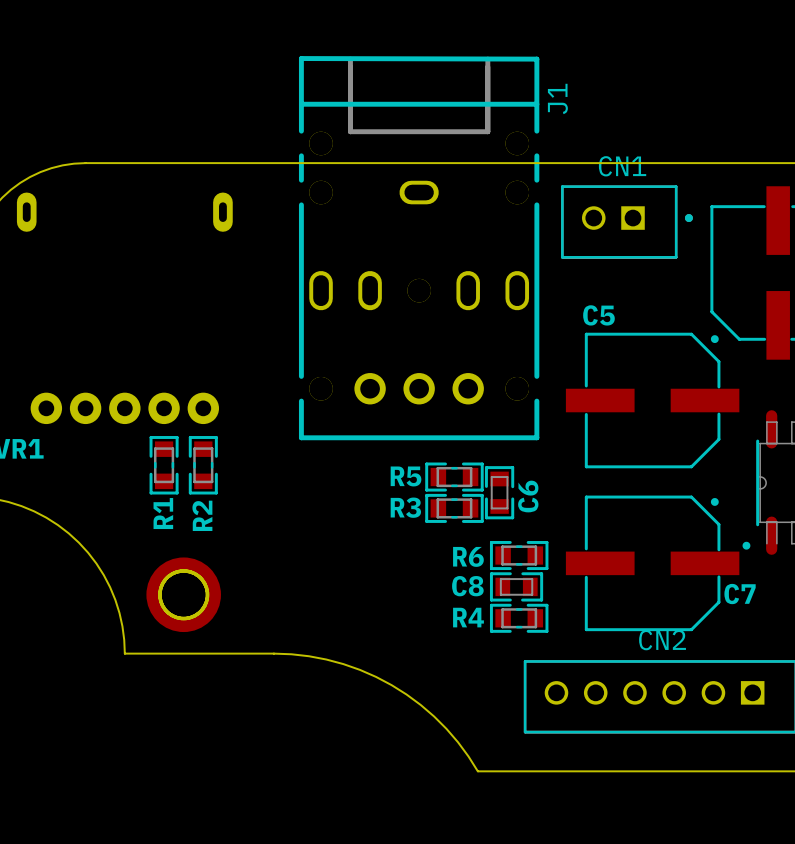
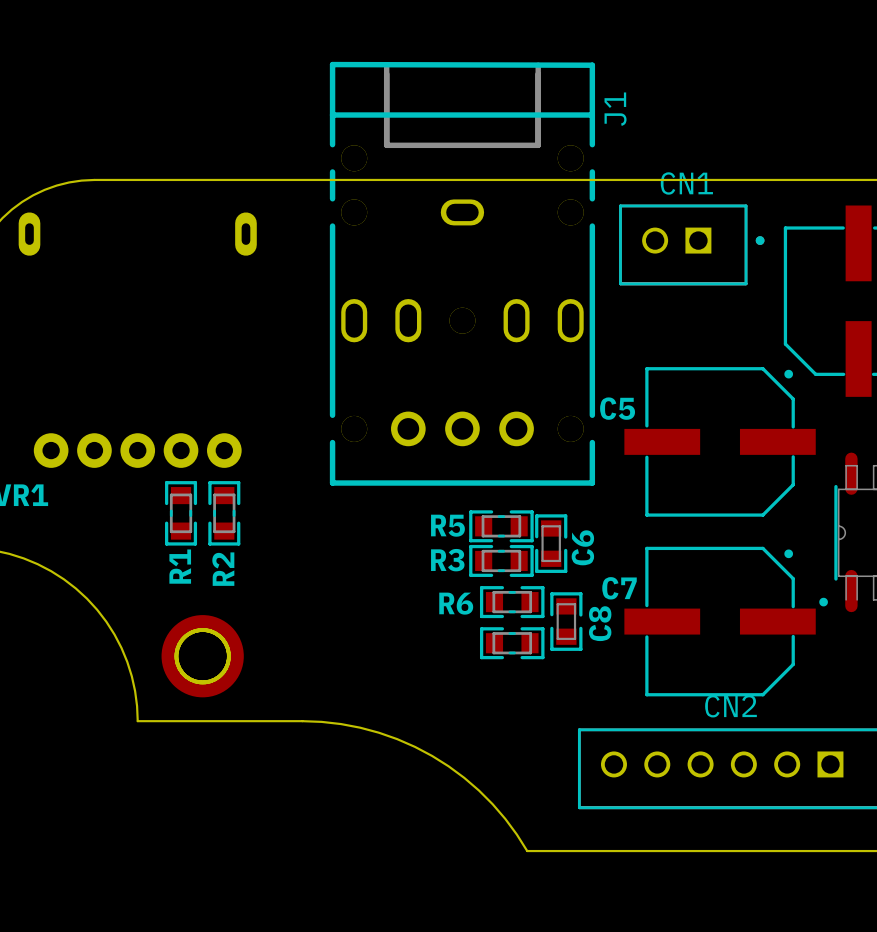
C5 name position: C5 (598, 315) -> C5 (617, 408)
R6 position: (519, 555) -> (512, 602)
part: none -> (512, 643)
C8 name position: C8 (467, 586) -> C8 (600, 623)
C8 rotation: 0° (516, 586) -> 90° clockwise (566, 621)
C7 name position: C7 (740, 594) -> C7 (619, 588)
R4: (519, 618) -> none

